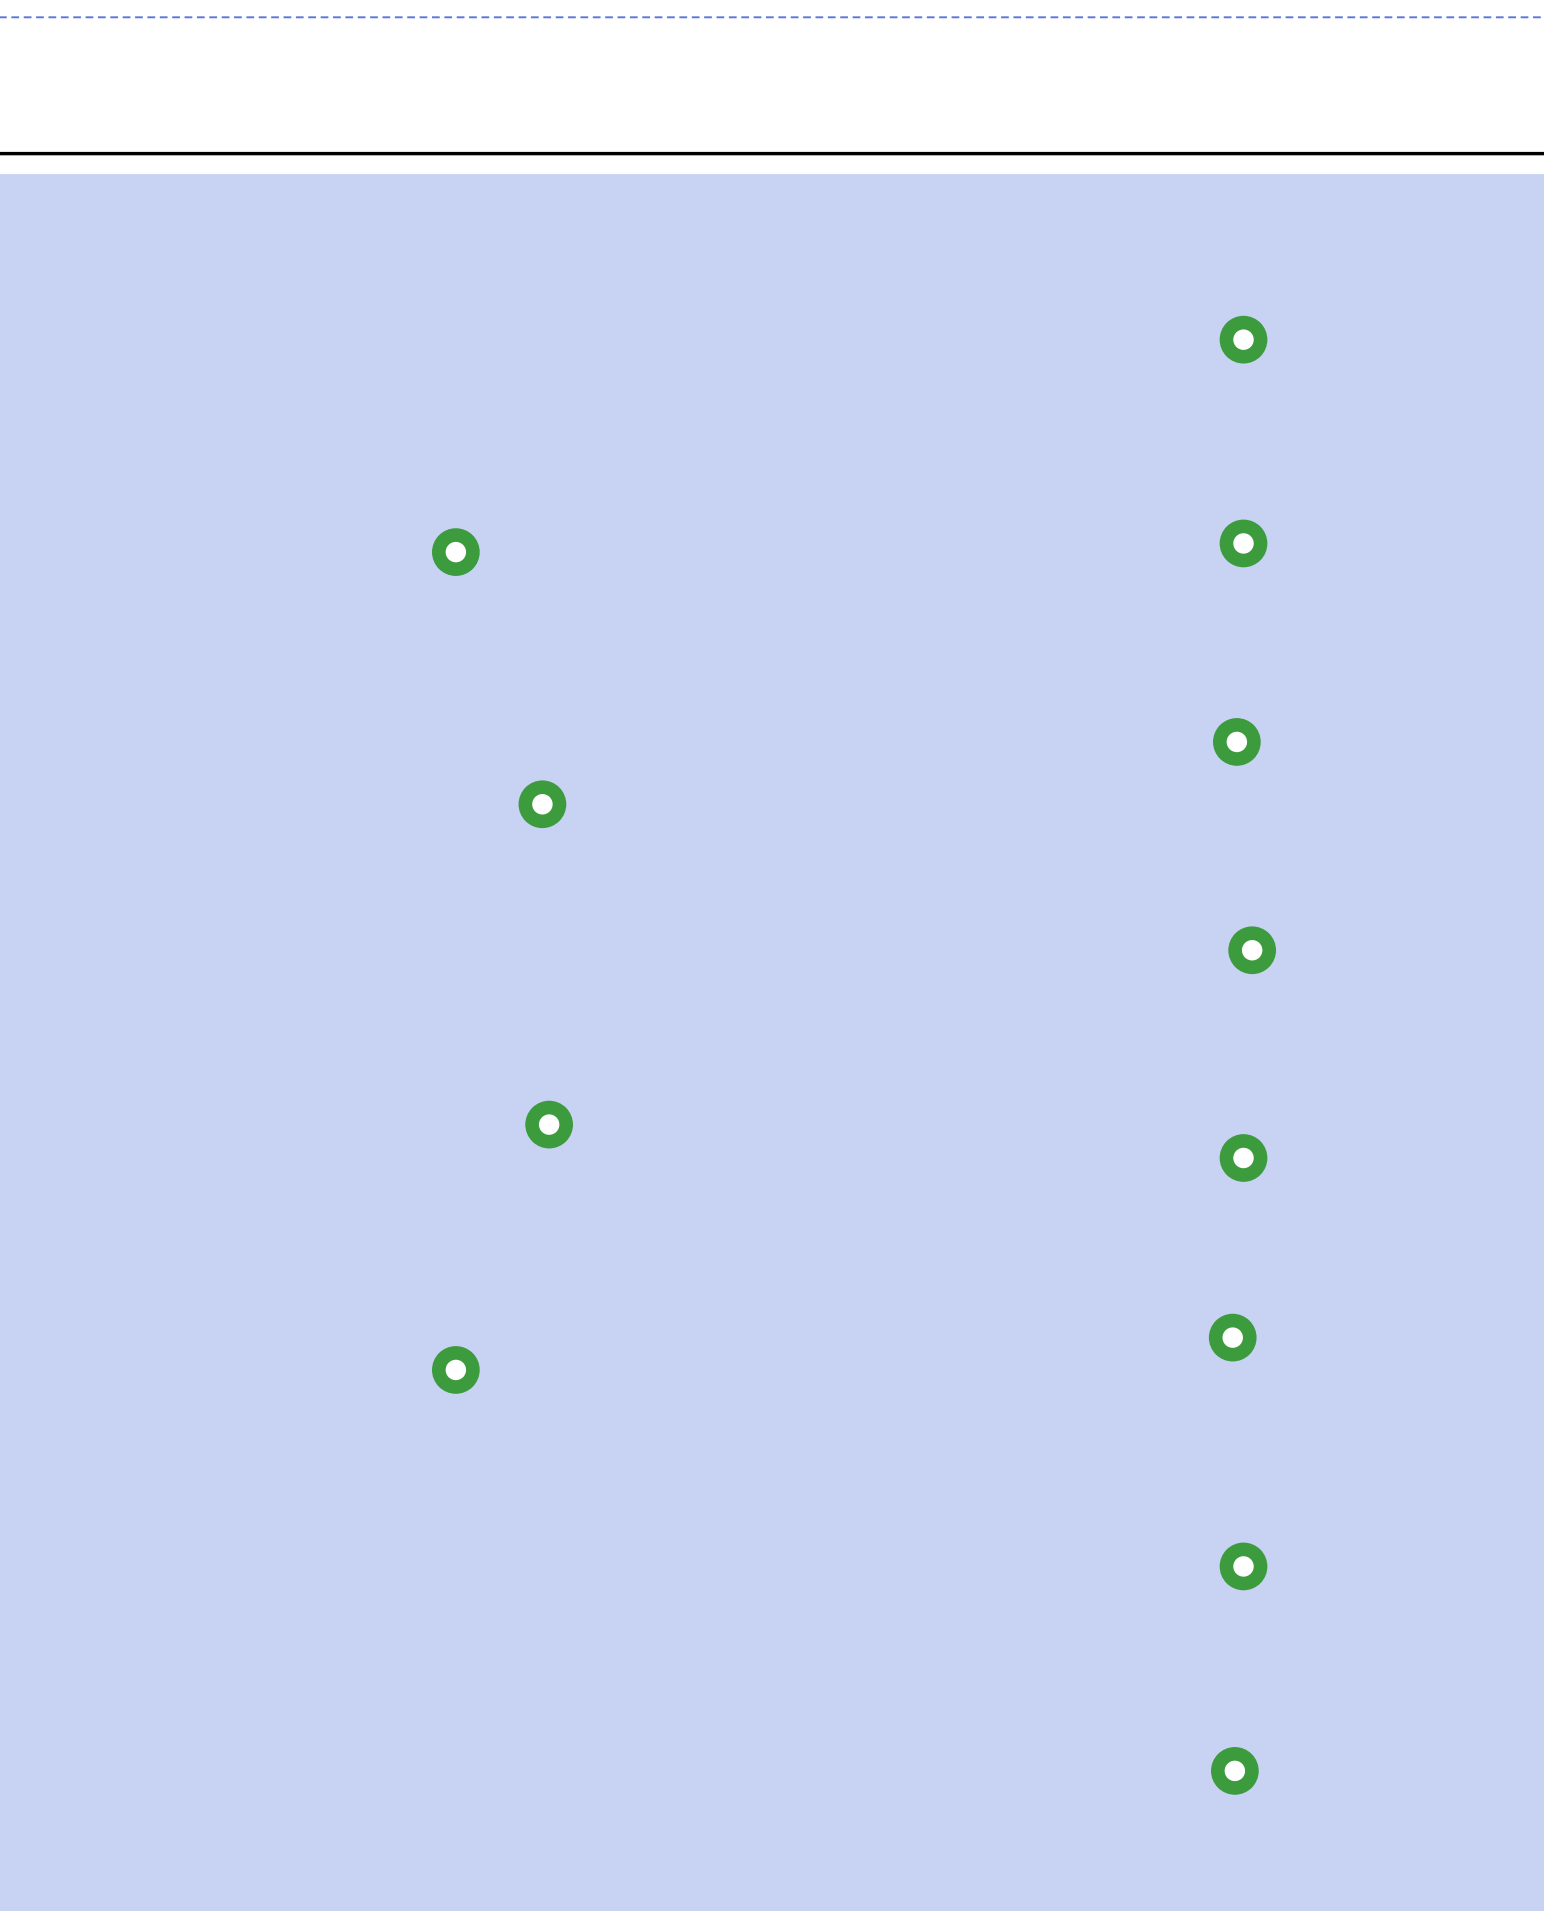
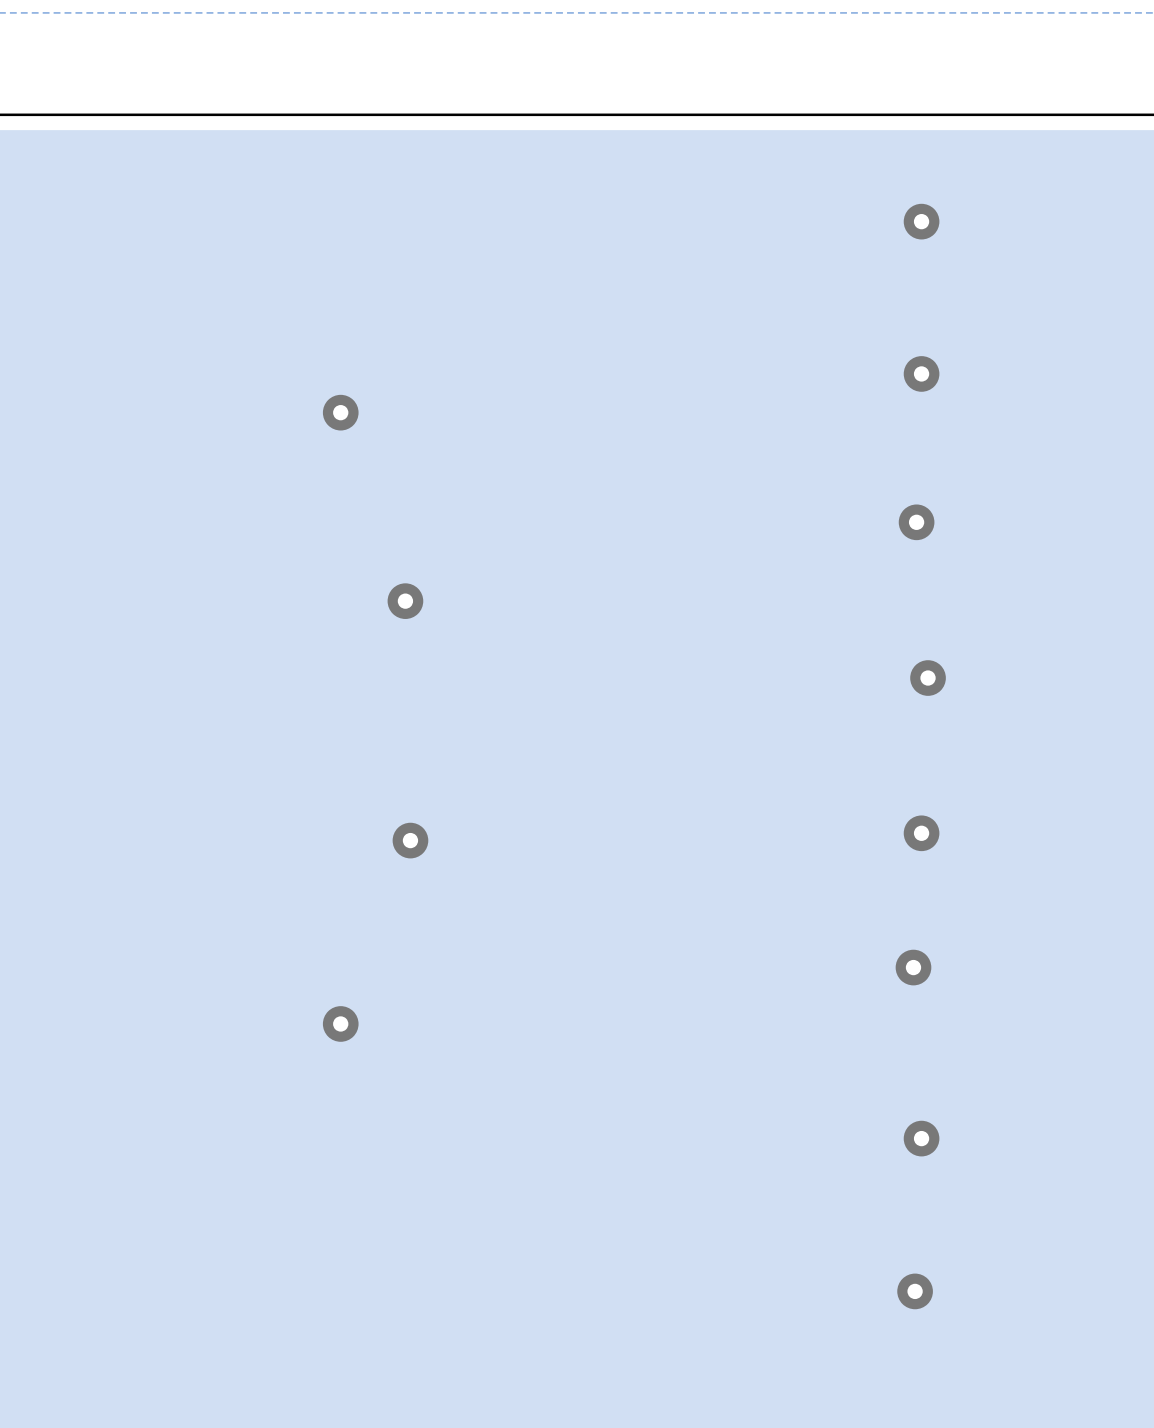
via position: (1243, 339) -> (921, 221)
via position: (1243, 543) -> (921, 373)
via position: (1236, 741) -> (916, 522)
via position: (1252, 950) -> (928, 678)
via position: (1243, 1157) -> (921, 833)
via position: (1232, 1337) -> (913, 967)
via position: (1243, 1566) -> (921, 1138)
via position: (1234, 1770) -> (915, 1291)

